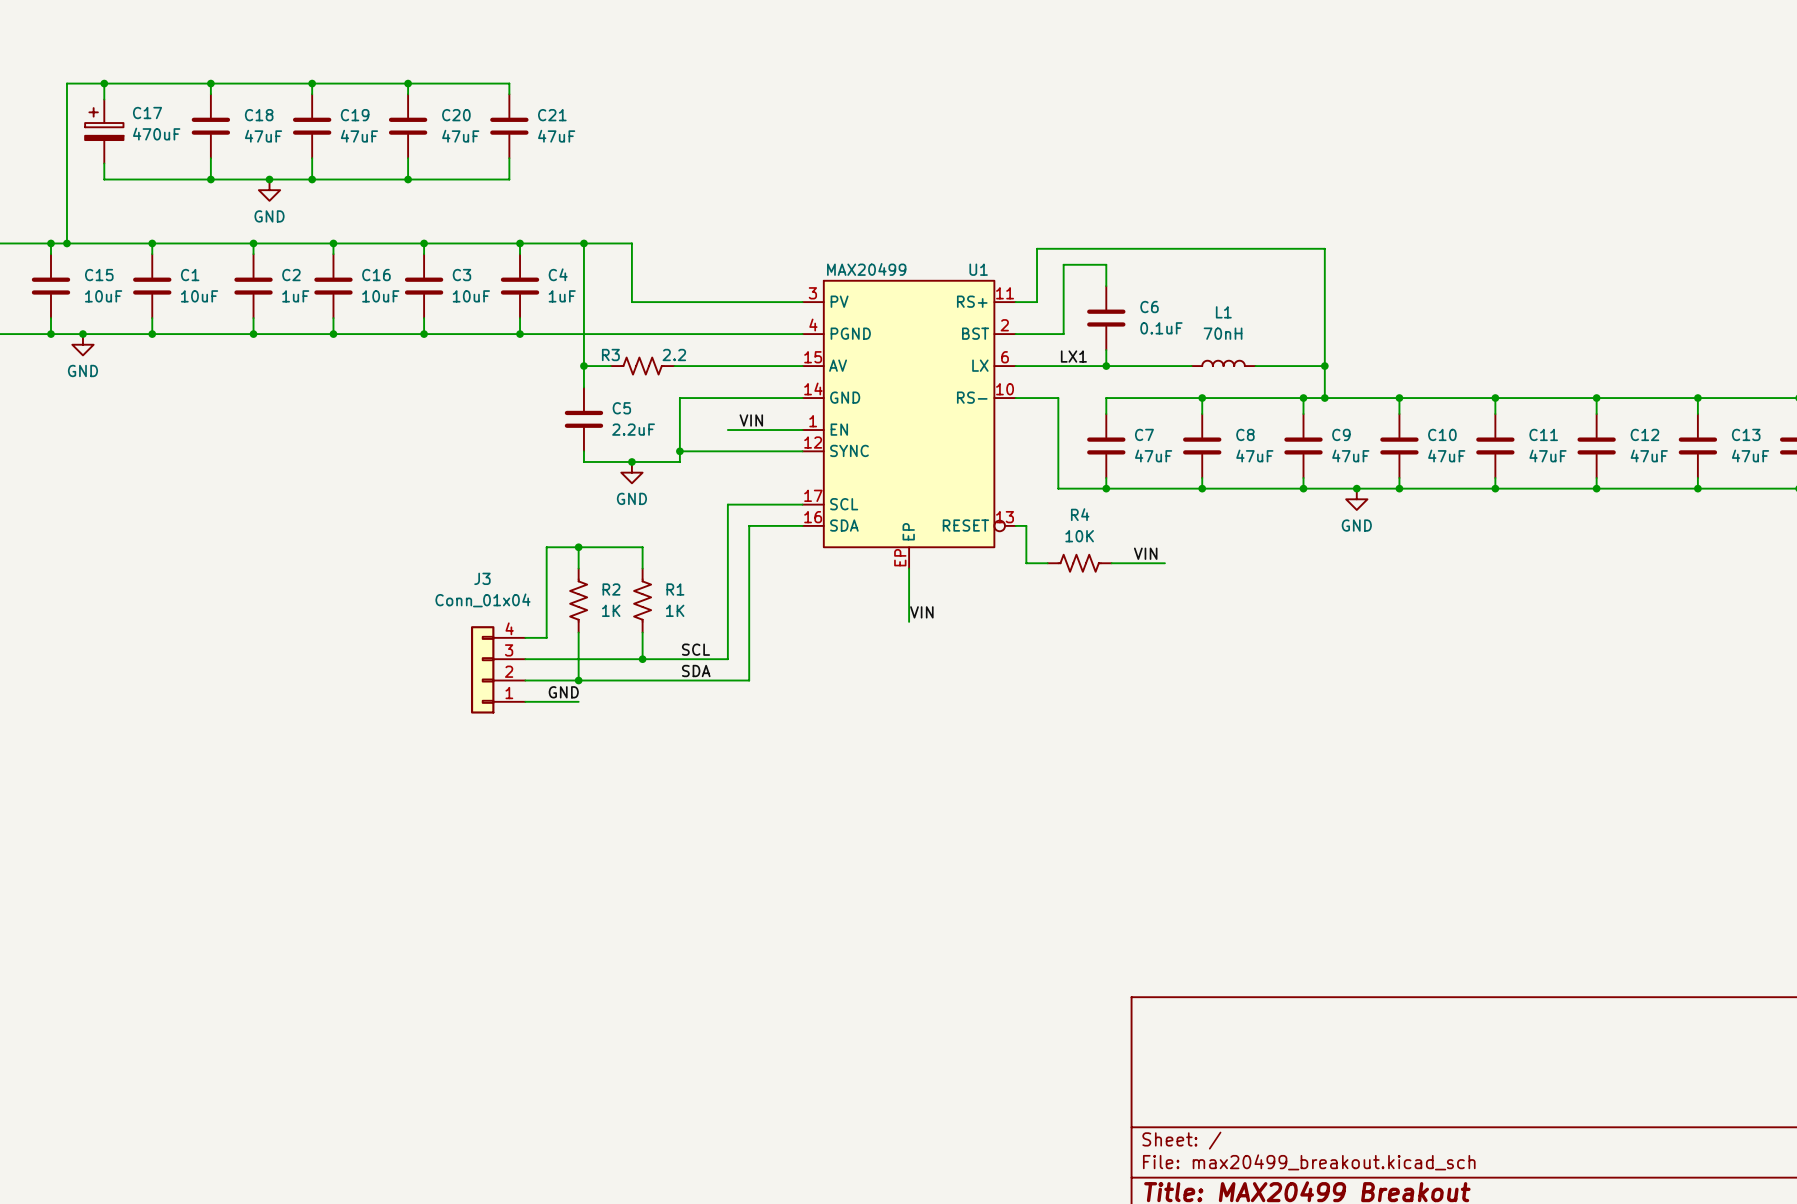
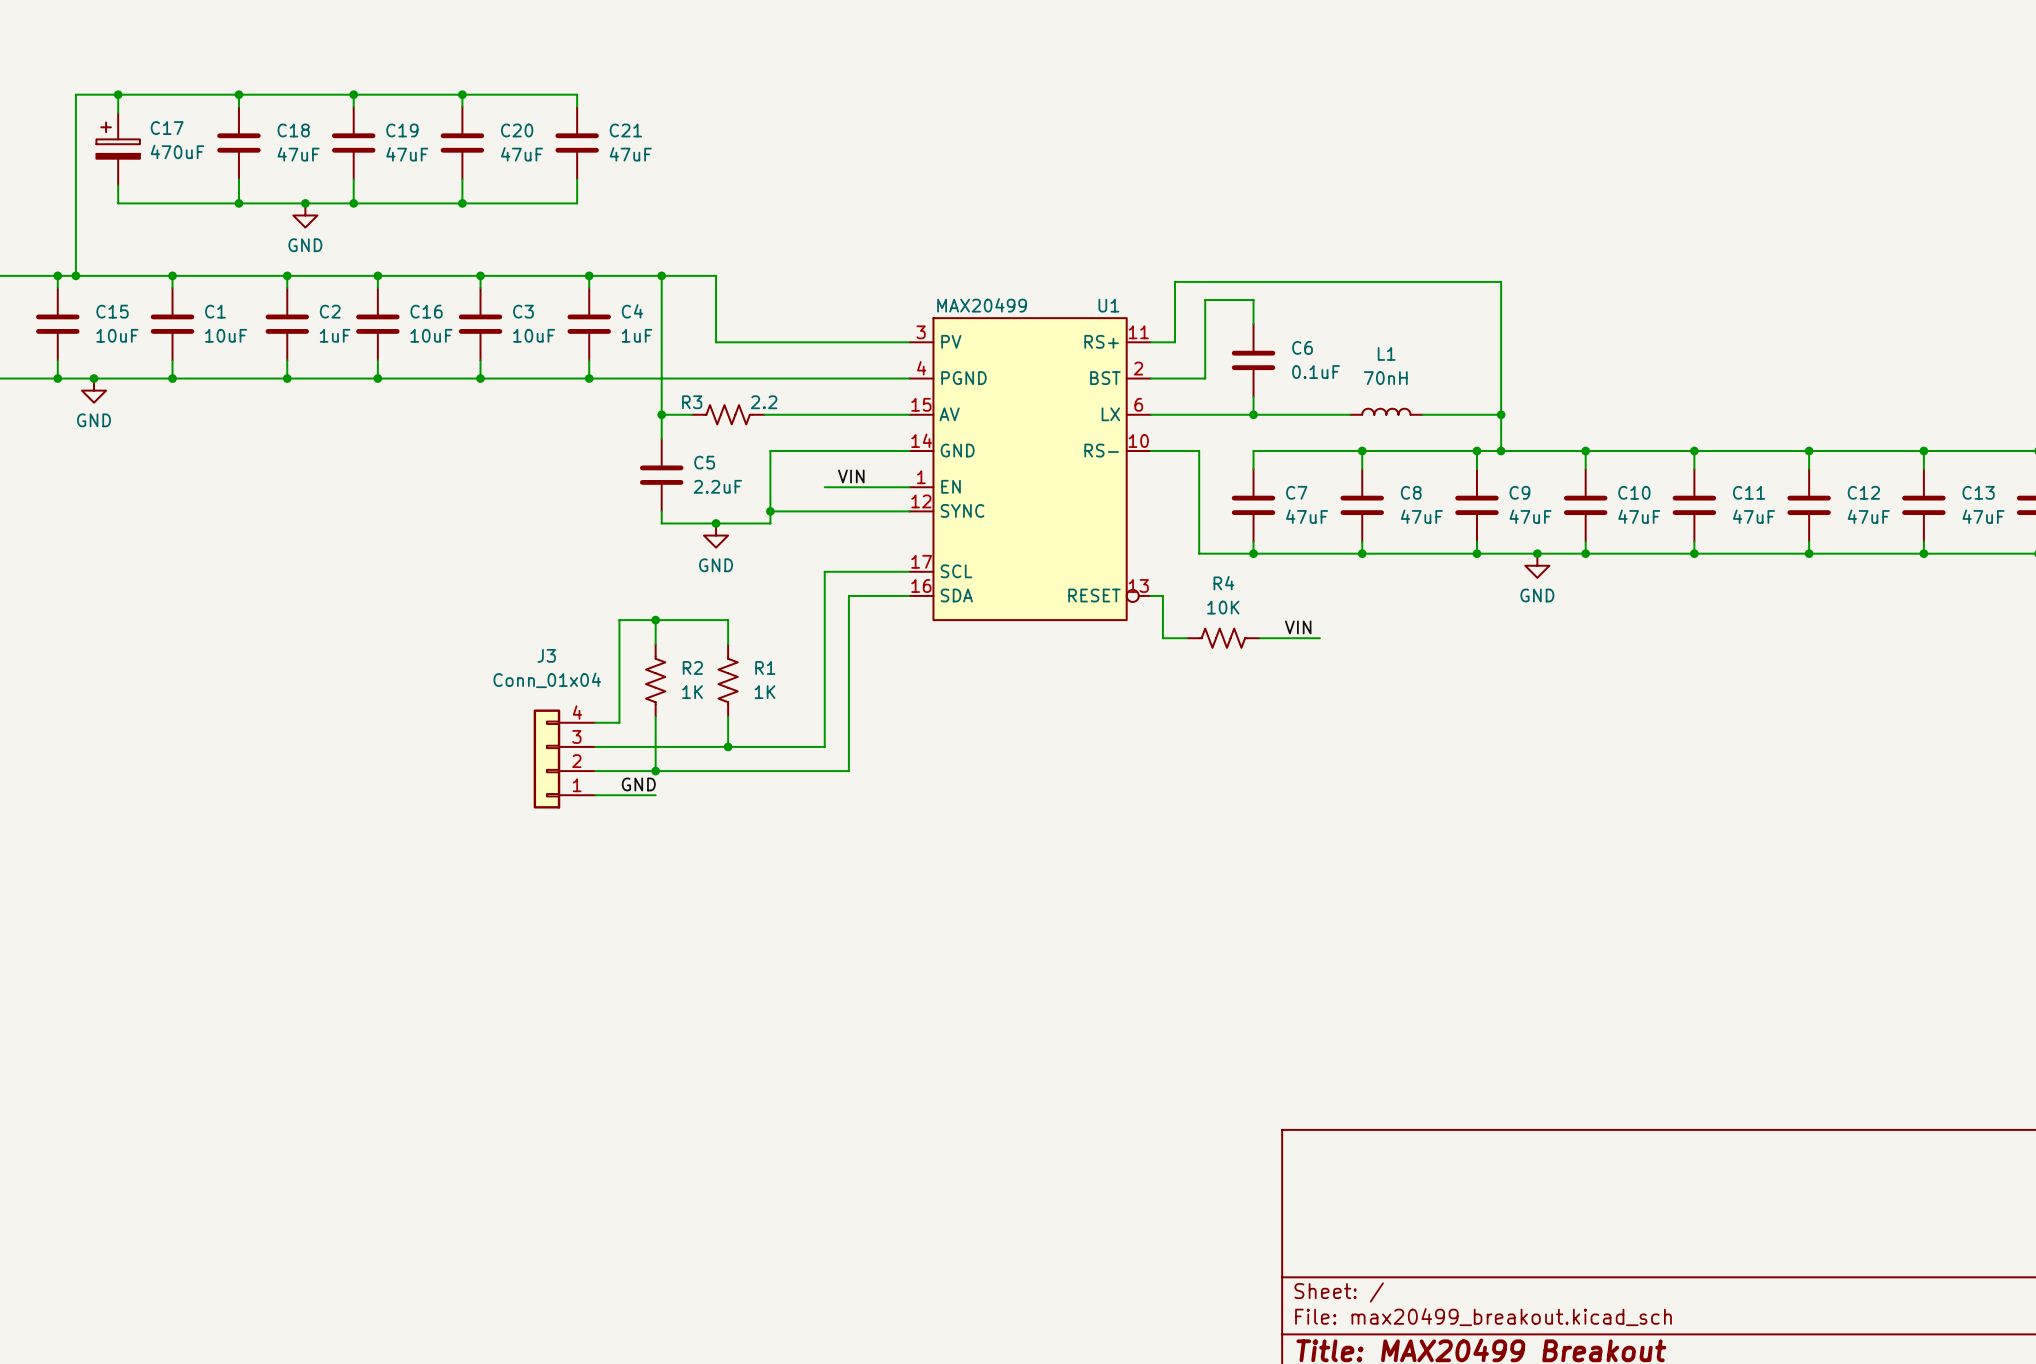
U1 symbol: [802, 280, 1016, 569] -> [909, 317, 1151, 621]
label: LX1 (1073, 356) -> none
wire: (909, 568) (909, 621) -> none
label: VIN (921, 612) -> none
label: SCL (695, 649) -> none
label: SDA (696, 671) -> none

